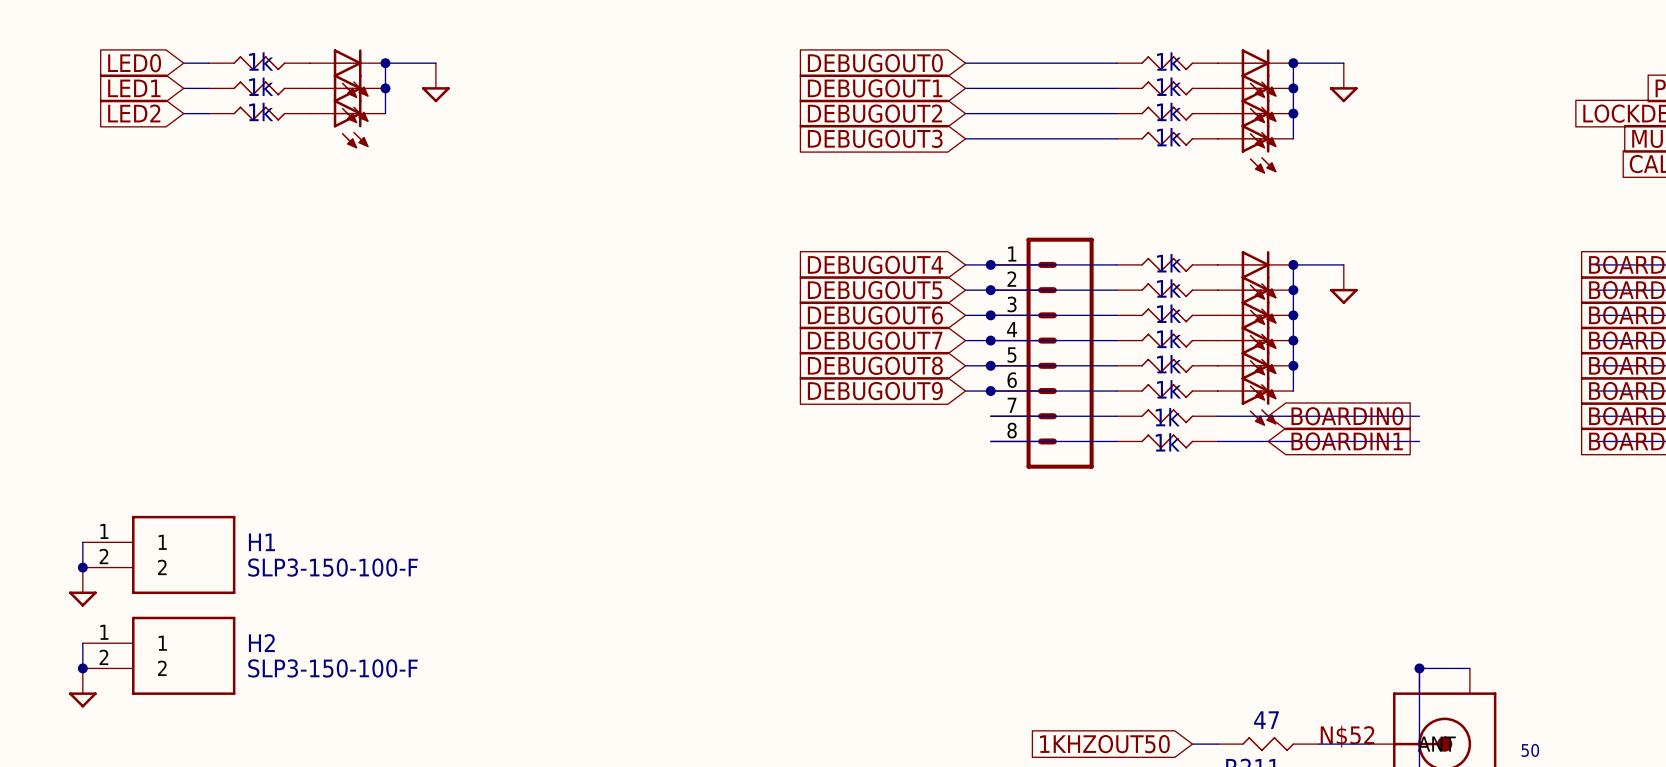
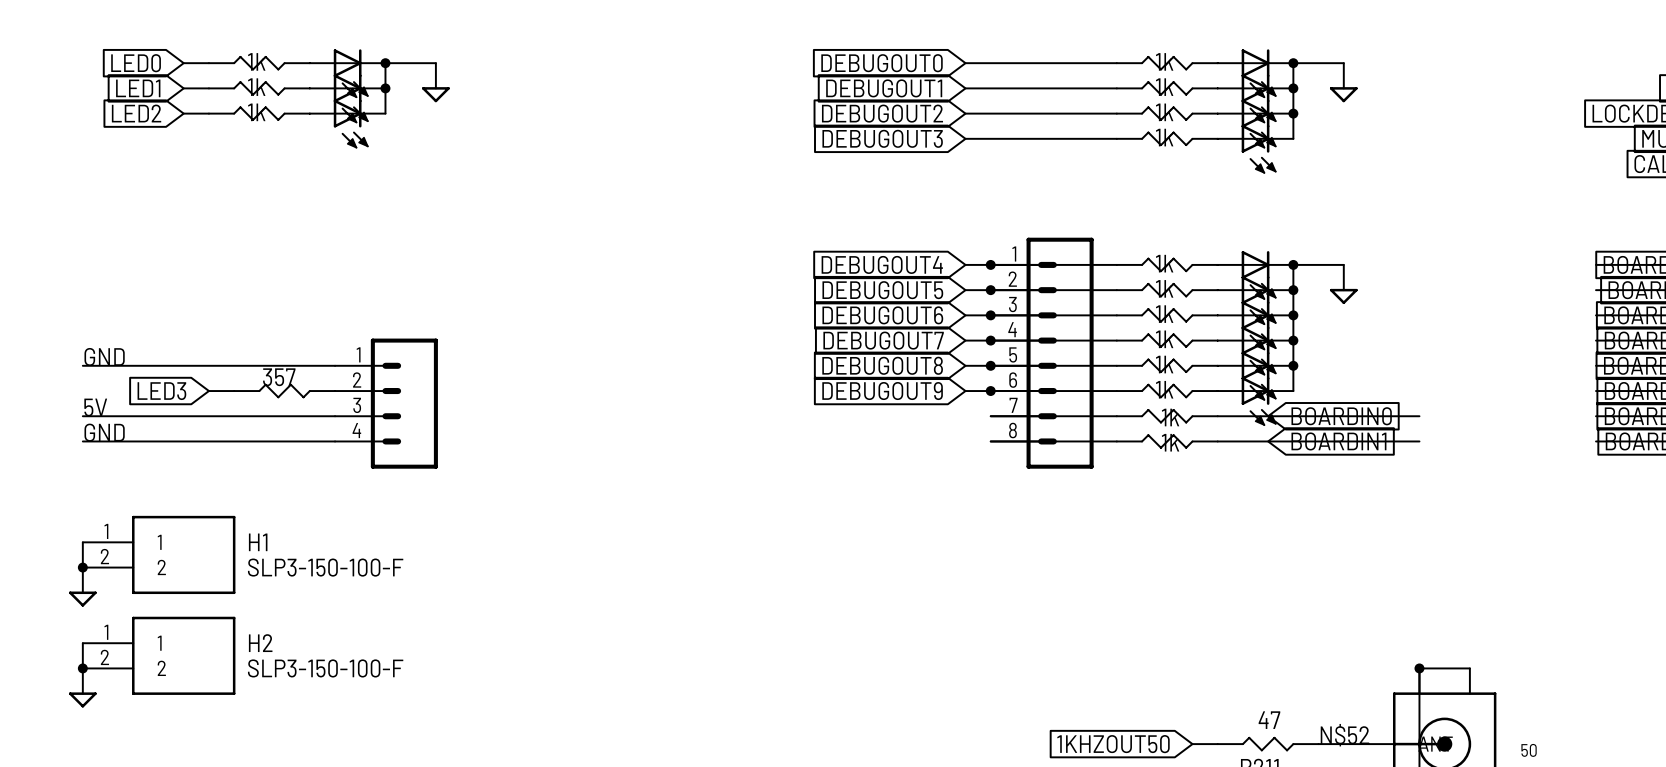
label: none -> GND (104, 356)
wire: none -> (82, 365) (335, 365)
global label: none -> LED3 (161, 391)
wire: none -> (208, 391) (234, 391)
part: none -> 357 (284, 391)
part: none -> (386, 403)
label: none -> 5V (95, 407)
wire: none -> (82, 416) (335, 416)
label: none -> GND (104, 432)
wire: none -> (82, 441) (335, 441)

